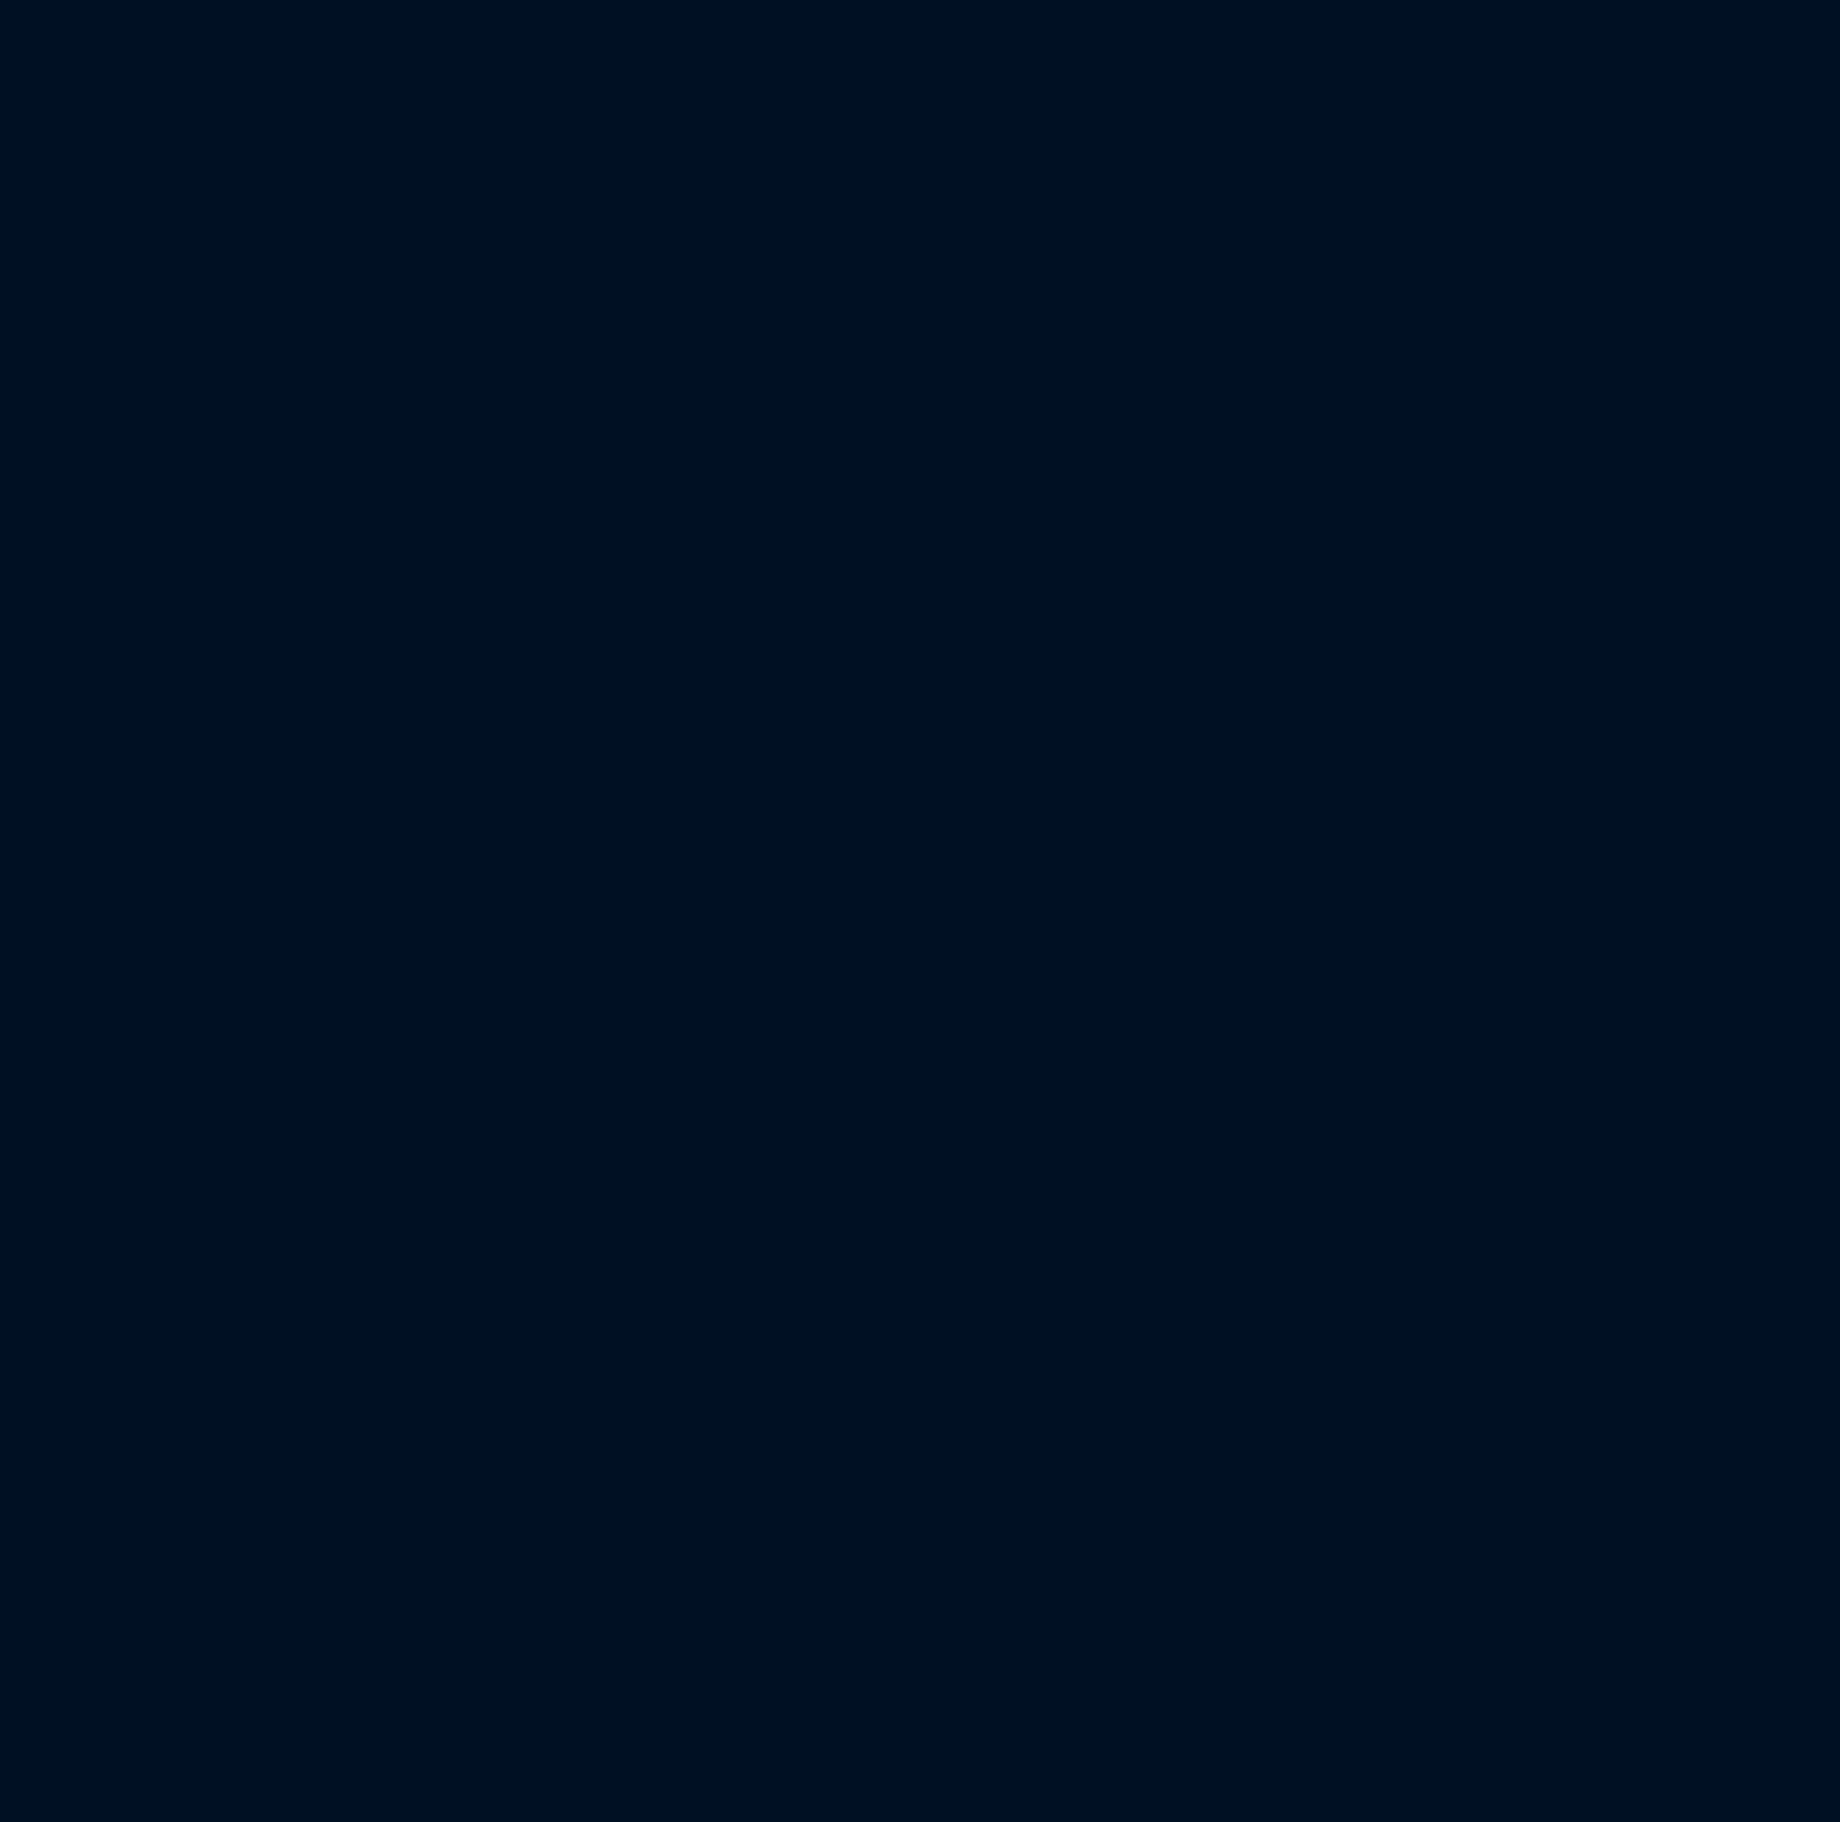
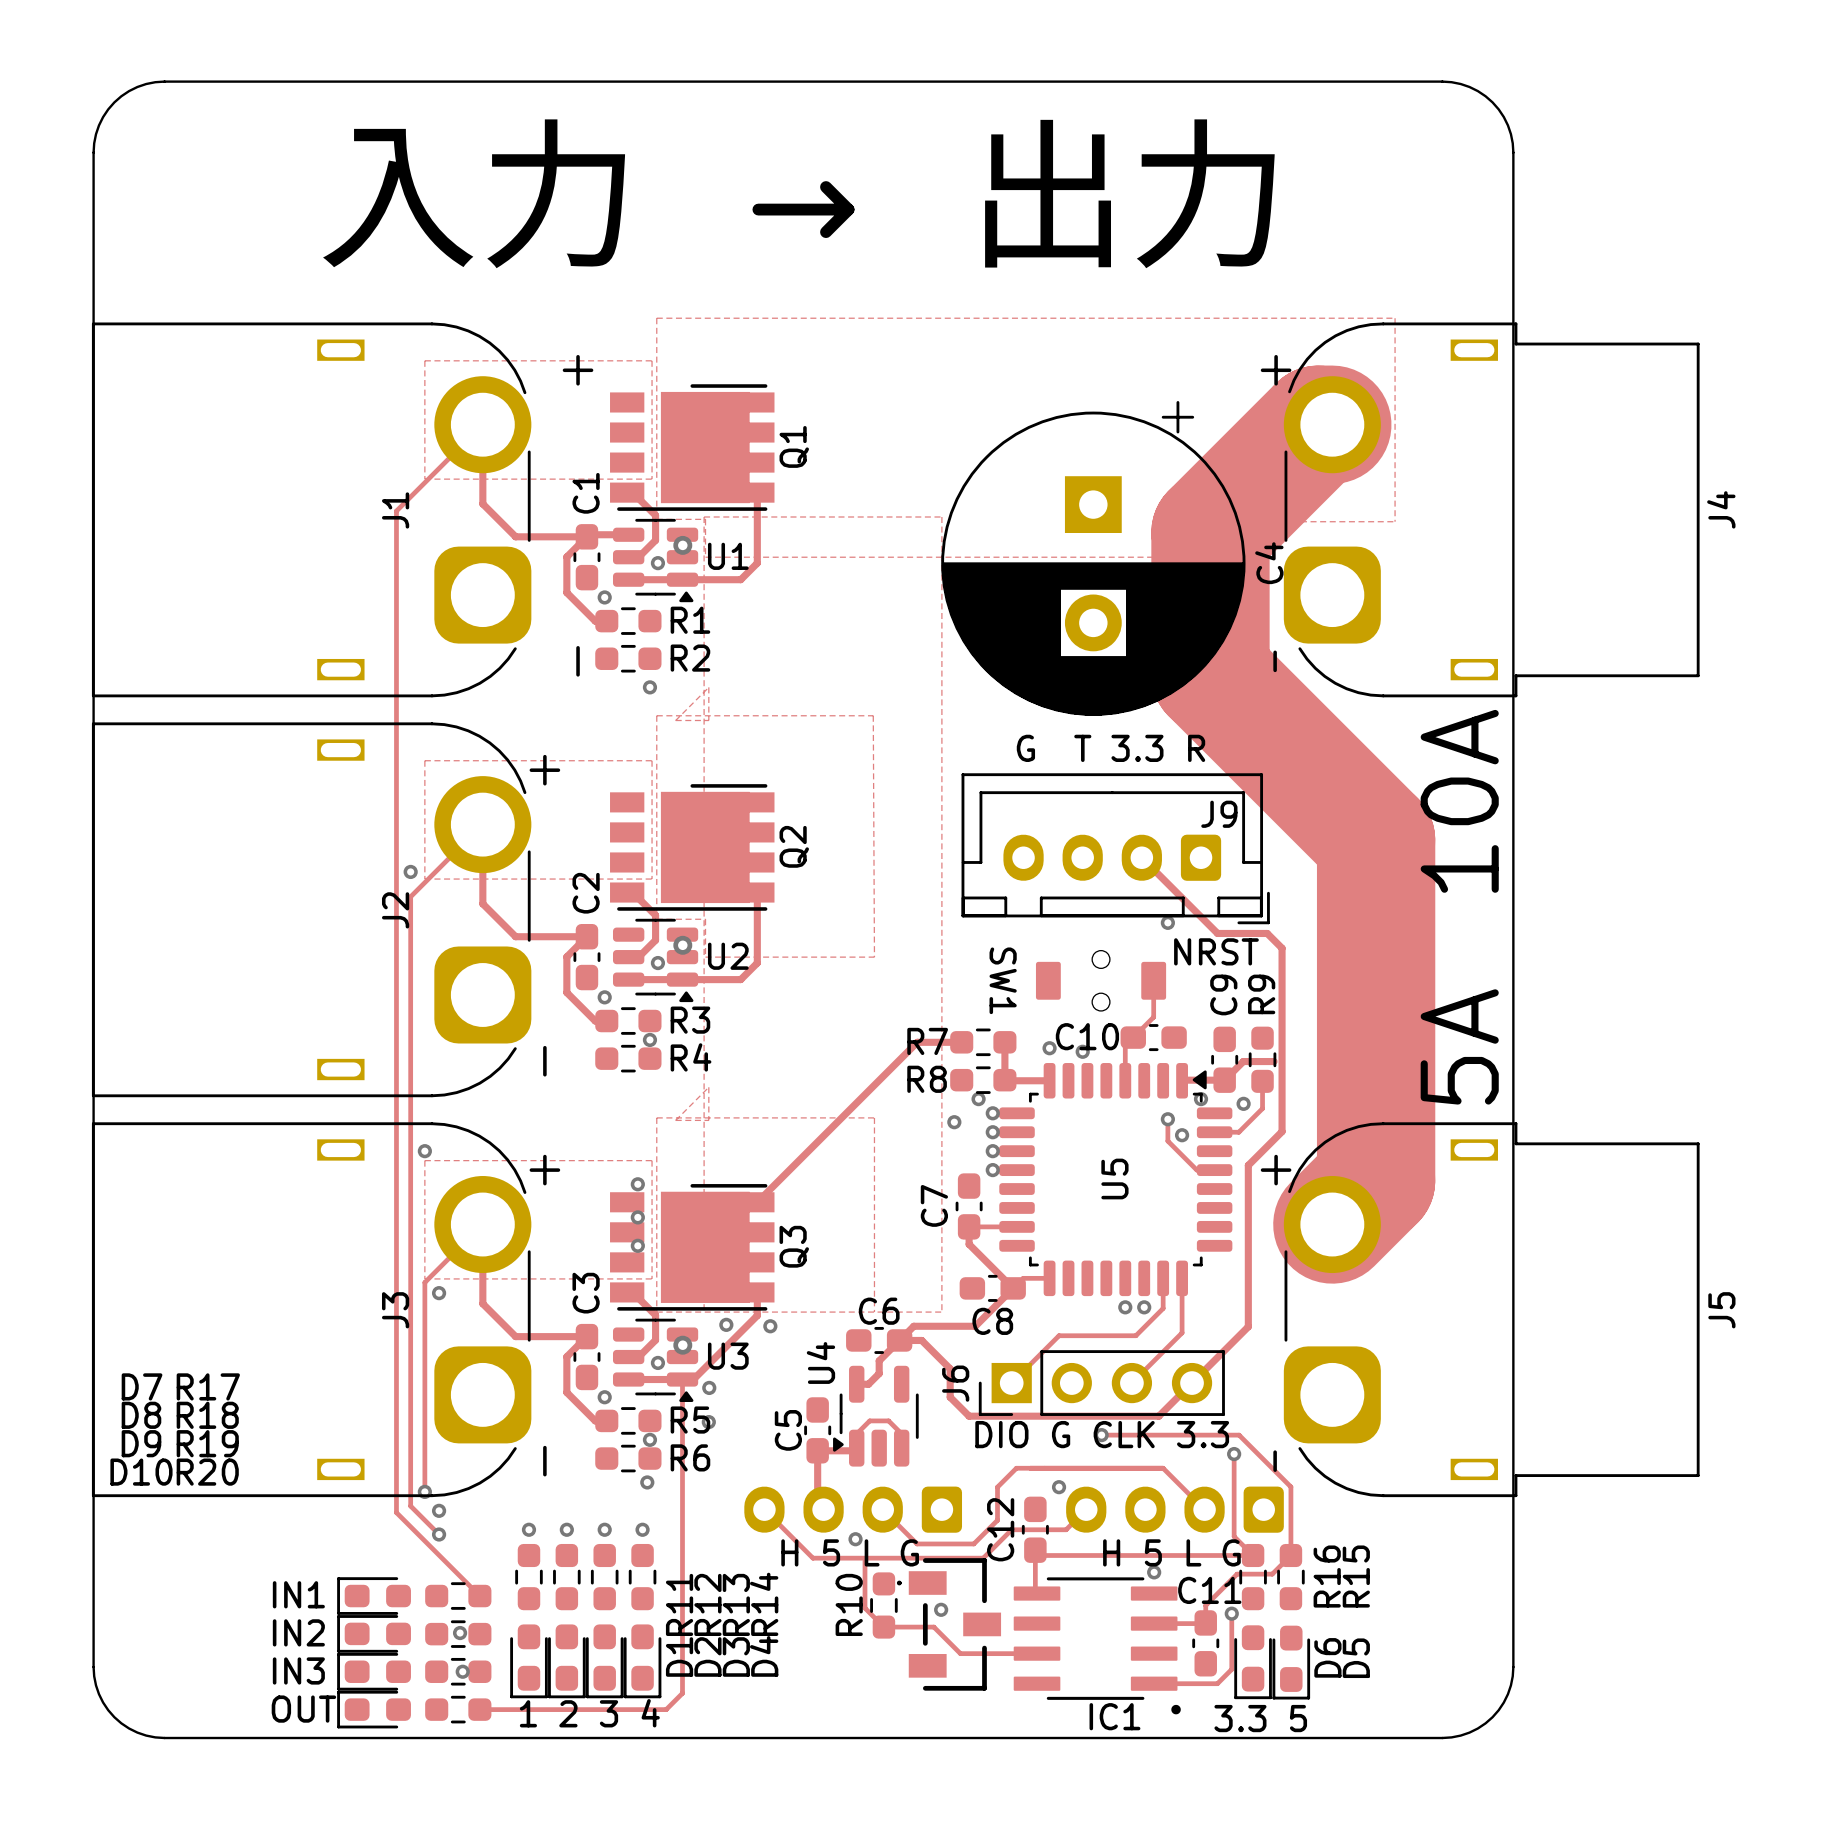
board edge: none -> (164, 81) (1442, 81) (1460, 84) (1477, 91) (1498, 109) (1507, 125) (1513, 152) (1513, 1667) (1507, 1694) (1498, 1710) (1485, 1723) (1460, 1735) (1442, 1738) (164, 1738) (146, 1735) (129, 1728) (108, 1710) (96, 1685) (93, 1667) (93, 152) (98, 125) (114, 102) (137, 87) (164, 81)
text: none -> 入力 → 出力 (798, 193)
zone outline: none -> (656, 318) (656, 519) (705, 519) (705, 557) (1262, 557) (1262, 521) (1395, 521) (1395, 318) (656, 318)
zone outline: none -> (424, 360) (424, 479) (652, 479) (652, 360) (424, 360)
track: none -> (1332, 424) (1318, 424) (1210, 532) (1210, 674) (1376, 839) (1376, 1180) (1332, 1224)
Q1: none -> (692, 447)
track: none -> (627, 492) (632, 492) (655, 515) (655, 540) (638, 557) (628, 557)
track: none -> (757, 492) (757, 563) (740, 579) (628, 579)
J1: none -> (311, 509)
J4: none -> (1491, 509)
track: none -> (628, 534) (589, 534) (566, 556) (566, 592) (595, 621) (606, 621)
track: none -> (586, 536) (515, 536) (482, 503) (482, 424) (396, 511) (396, 1512) (479, 1596)
via: none -> (682, 545)
C1: none -> (586, 557)
C4: none -> (1093, 558)
U1: none -> (655, 560)
via: none -> (657, 563)
via: none -> (604, 597)
R1: none -> (628, 621)
R2: none -> (628, 658)
via: none -> (649, 687)
zone outline: none -> (708, 687) (675, 720) (708, 720) (708, 687)
zone outline: none -> (656, 715) (656, 919) (705, 919) (705, 957) (874, 957) (873, 715) (656, 715)
text: none -> G T 3.3 R (1110, 748)
zone outline: none -> (424, 760) (424, 879) (652, 879) (652, 760) (424, 760)
text: none -> 10A (1459, 801)
Q2: none -> (692, 847)
J9: none -> (1115, 848)
track: none -> (1141, 857) (1217, 933) (1267, 933) (1282, 948) (1282, 1131) (1248, 1165) (1248, 1326) (1158, 1416) (969, 1416) (950, 1397) (950, 1368) (921, 1340) (899, 1340)
via: none -> (410, 871)
track: none -> (632, 892) (655, 915) (655, 940) (638, 957) (628, 957)
track: none -> (757, 892) (757, 963) (740, 979) (628, 979)
J2: none -> (311, 909)
via: none -> (1167, 922)
via: none -> (682, 945)
text: none -> NRST (1216, 951)
C2: none -> (586, 957)
U2: none -> (655, 960)
via: none -> (657, 963)
SW1: none -> (1101, 980)
track: none -> (1153, 980) (1153, 1017) (1125, 1045) (1125, 1080)
via: none -> (604, 997)
track: none -> (606, 1021) (595, 1021) (566, 992) (566, 956) (586, 936) (515, 936) (482, 903) (482, 824) (410, 896) (410, 1506) (439, 1534)
R3: none -> (628, 1021)
C10: none -> (1153, 1037)
via: none -> (649, 1039)
track: none -> (961, 1042) (917, 1042) (757, 1202)
R7: none -> (983, 1042)
track: none -> (1004, 1042) (1005, 1080) (1049, 1080)
via: none -> (1049, 1048)
via: none -> (1082, 1051)
text: none -> 5A (1459, 1046)
R4: none -> (628, 1058)
C9: none -> (1224, 1059)
R9: none -> (1262, 1059)
track: none -> (1274, 1061) (1243, 1061) (1224, 1080) (1182, 1080)
R8: none -> (983, 1080)
track: none -> (1262, 1081) (1262, 1108) (1238, 1132) (1214, 1132)
zone outline: none -> (708, 1087) (708, 1120) (675, 1120) (708, 1087)
via: none -> (978, 1099)
via: none -> (1201, 1099)
via: none -> (1243, 1103)
via: none -> (992, 1113)
track: none -> (1167, 1119) (1167, 1141) (1196, 1170) (1214, 1170)
via: none -> (1167, 1119)
via: none -> (954, 1122)
via: none -> (992, 1132)
via: none -> (1182, 1135)
via: none -> (424, 1151)
via: none -> (992, 1151)
zone outline: none -> (424, 1160) (424, 1278) (652, 1278) (652, 1160) (424, 1160)
via: none -> (992, 1170)
U5: none -> (1115, 1179)
via: none -> (637, 1184)
C7: none -> (969, 1206)
via: none -> (637, 1217)
track: none -> (1017, 1226) (969, 1226) (969, 1244) (1013, 1288)
via: none -> (637, 1245)
Q3: none -> (692, 1247)
track: none -> (1049, 1278) (1023, 1278) (1013, 1288)
track: none -> (1163, 1278) (1163, 1308) (1135, 1335) (1059, 1335) (1011, 1383)
track: none -> (1182, 1278) (1182, 1332) (1131, 1383)
C8: none -> (992, 1288)
track: none -> (1013, 1288) (975, 1326) (913, 1326) (879, 1360) (879, 1373) (868, 1384) (856, 1384)
track: none -> (632, 1292) (655, 1315) (655, 1340) (638, 1357) (628, 1357)
track: none -> (757, 1292) (757, 1315) (693, 1379) (628, 1379)
via: none -> (439, 1293)
via: none -> (1125, 1307)
via: none -> (1144, 1307)
J3: none -> (311, 1309)
J5: none -> (1491, 1309)
zone outline: none -> (704, 1312) (704, 516) (941, 516) (941, 1312) (656, 1312) (656, 1117) (874, 1117) (874, 1312)
via: none -> (726, 1324)
via: none -> (770, 1326)
C6: none -> (879, 1340)
via: none -> (682, 1345)
C3: none -> (586, 1357)
U3: none -> (655, 1360)
via: none -> (657, 1362)
track: none -> (682, 1379) (682, 1693) (666, 1709) (479, 1709)
J6: none -> (1101, 1383)
via: none -> (709, 1387)
via: none -> (604, 1397)
U4: none -> (875, 1416)
track: none -> (606, 1420) (595, 1420) (566, 1392) (566, 1356) (586, 1336) (515, 1336) (482, 1303) (482, 1224) (424, 1282) (424, 1491)
R5: none -> (628, 1420)
via: none -> (708, 1422)
C5: none -> (817, 1430)
text: none -> DIO G CLK 3.3 (1102, 1434)
track: none -> (1101, 1435) (1239, 1435) (1290, 1486) (1290, 1555) (1272, 1574) (1237, 1574) (1205, 1605) (1205, 1623) (1154, 1623)
via: none -> (1101, 1435)
via: none -> (649, 1439)
track: none -> (901, 1448) (901, 1433) (888, 1420) (869, 1420) (856, 1433) (856, 1448) (854, 1450) (817, 1450) (817, 1503) (823, 1509)
track: none -> (1234, 1454) (1234, 1536) (1253, 1555) (1040, 1555) (1035, 1550) (1035, 1591) (1037, 1593)
via: none -> (1234, 1454)
R6: none -> (628, 1458)
via: none -> (647, 1482)
via: none -> (1059, 1487)
via: none -> (424, 1491)
track: none -> (764, 1509) (812, 1558) (983, 1558) (1011, 1529) (1066, 1529) (1086, 1509)
part: none -> (853, 1509)
track: none -> (882, 1509) (917, 1543) (973, 1543) (997, 1520) (997, 1487) (1016, 1468) (1163, 1468) (1204, 1509)
part: none -> (1174, 1509)
via: none -> (439, 1510)
via: none -> (528, 1529)
via: none -> (566, 1529)
via: none -> (604, 1529)
via: none -> (642, 1529)
C12: none -> (1035, 1529)
via: none -> (439, 1534)
via: none -> (855, 1539)
text: none -> H 5 L G (850, 1552)
text: none -> H 5 L G (1171, 1552)
track: none -> (865, 1561) (865, 1608) (883, 1627) (933, 1627) (960, 1653) (1037, 1653)
via: none -> (1154, 1572)
R11: none -> (528, 1577)
R12: none -> (566, 1577)
R13: none -> (604, 1577)
R14: none -> (642, 1577)
R16: none -> (1253, 1577)
R15: none -> (1290, 1577)
text: none -> IN1 (298, 1594)
D7: none -> (374, 1596)
R17: none -> (458, 1596)
R10: none -> (883, 1605)
via: none -> (941, 1609)
track: none -> (1231, 1613) (1231, 1669) (1217, 1683) (1154, 1683)
via: none -> (1231, 1613)
part: none -> (949, 1624)
text: none -> IN2 (298, 1632)
D8: none -> (374, 1633)
via: none -> (460, 1633)
R18: none -> (458, 1634)
C11: none -> (1205, 1643)
IC1: none -> (1097, 1645)
D1: none -> (528, 1661)
D2: none -> (566, 1661)
D3: none -> (604, 1661)
D4: none -> (642, 1661)
D6: none -> (1253, 1662)
D5: none -> (1291, 1662)
text: none -> IN3 (298, 1670)
D9: none -> (374, 1671)
R19: none -> (458, 1671)
via: none -> (462, 1671)
text: none -> OUT (303, 1709)
D10: none -> (374, 1709)
R20: none -> (458, 1709)
text: none -> 1 2 3 4 (589, 1713)
text: none -> 3.3 5 (1260, 1718)

